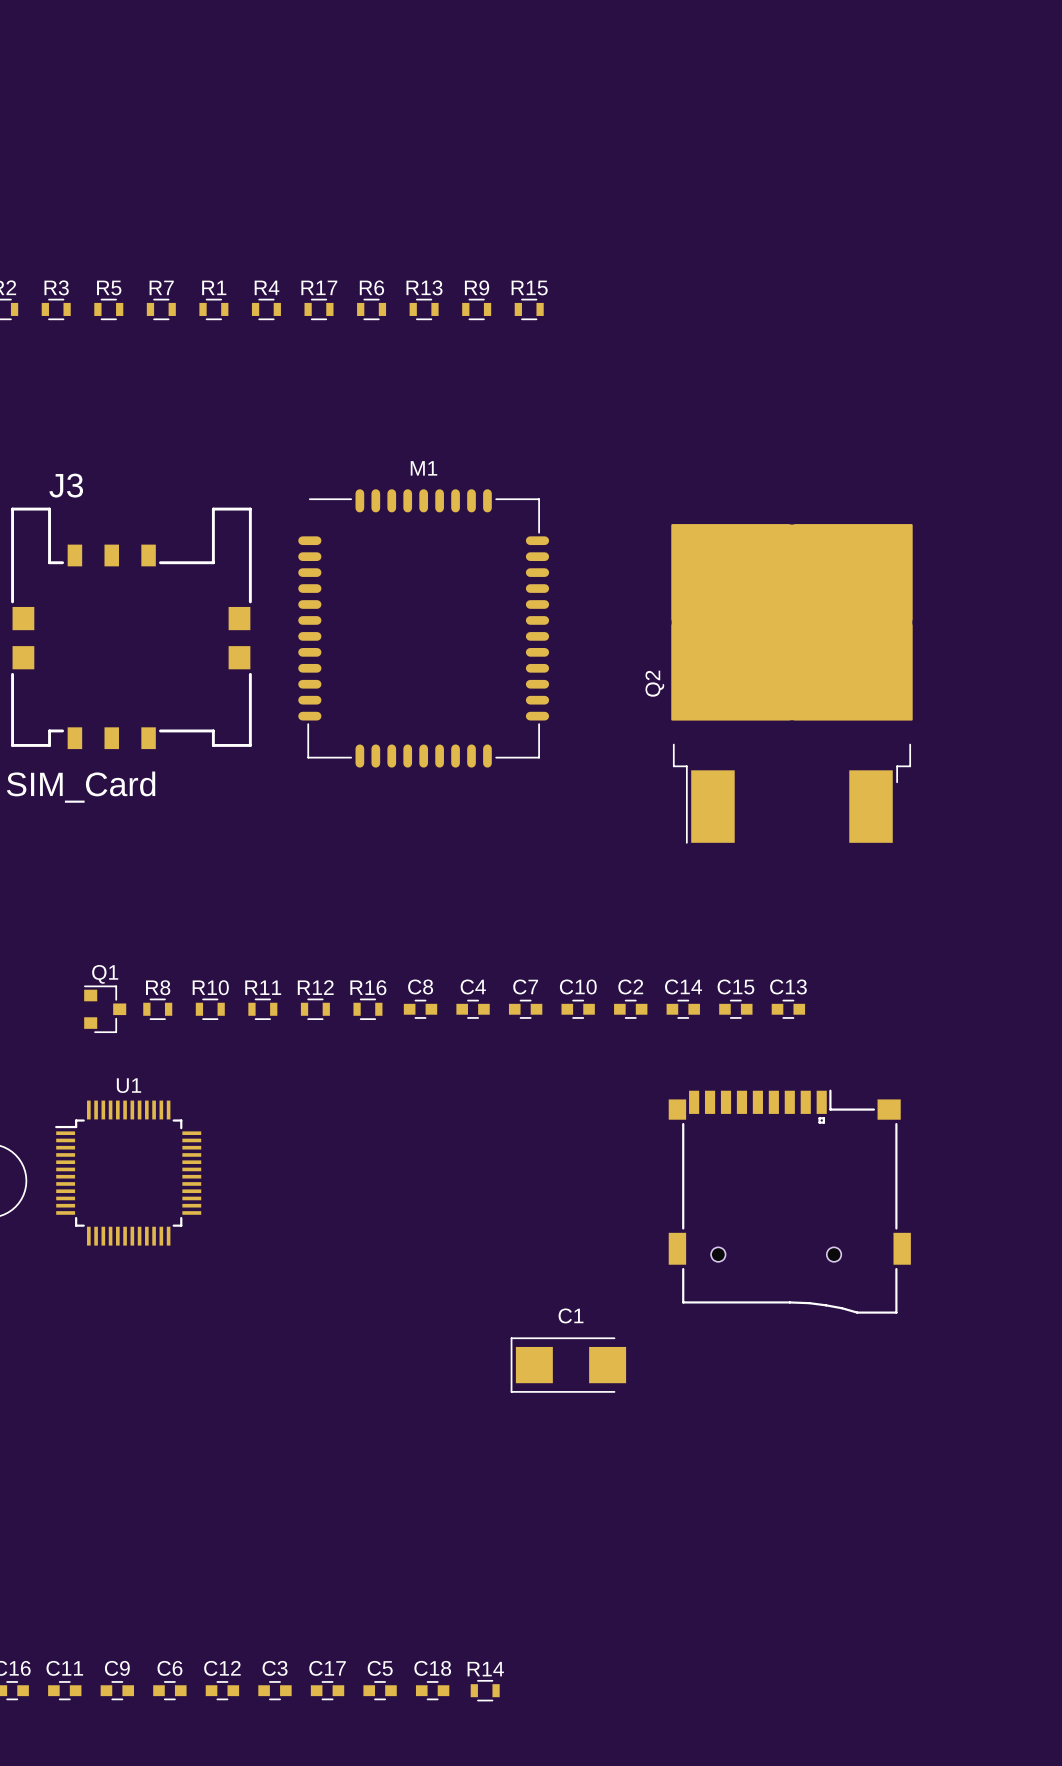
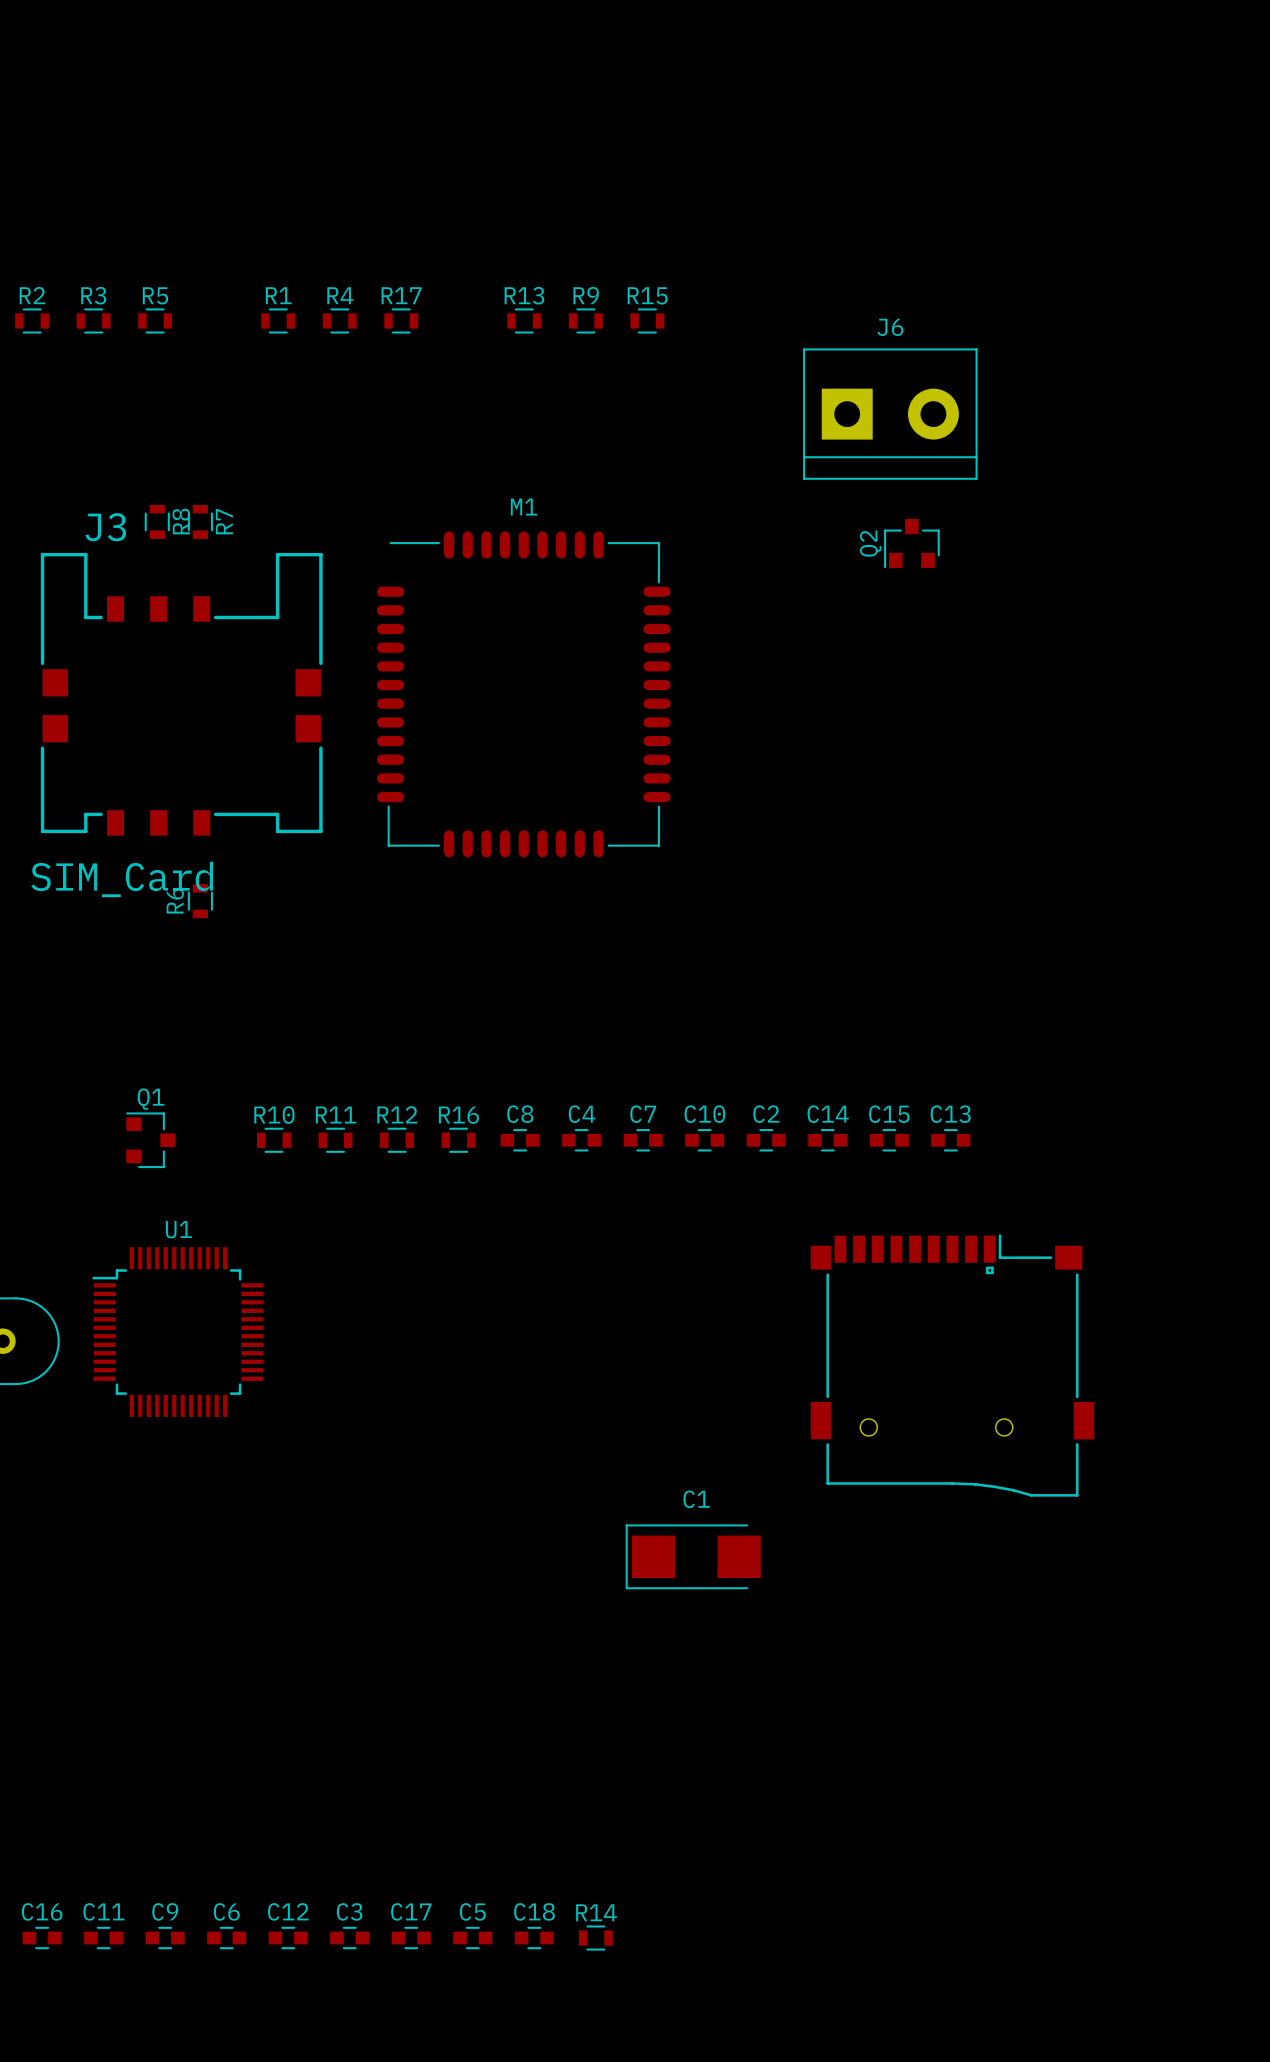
R6 name position: R6 (371, 287) -> R6 (175, 900)
R7 rotation: 0° (161, 309) -> 90° clockwise (200, 521)
R7 position: (161, 309) -> (200, 521)
R6 rotation: 0° (371, 309) -> 90° clockwise (200, 901)
R6 position: (371, 309) -> (200, 901)
J6: none -> (890, 414)
Q2 footprint: [671, 524, 913, 844] -> [884, 518, 940, 569]
Q2 name position: Q2 (654, 683) -> Q2 (870, 543)
R8 rotation: 0° (157, 1009) -> 90° clockwise (157, 521)
R8 position: (157, 1009) -> (157, 521)

